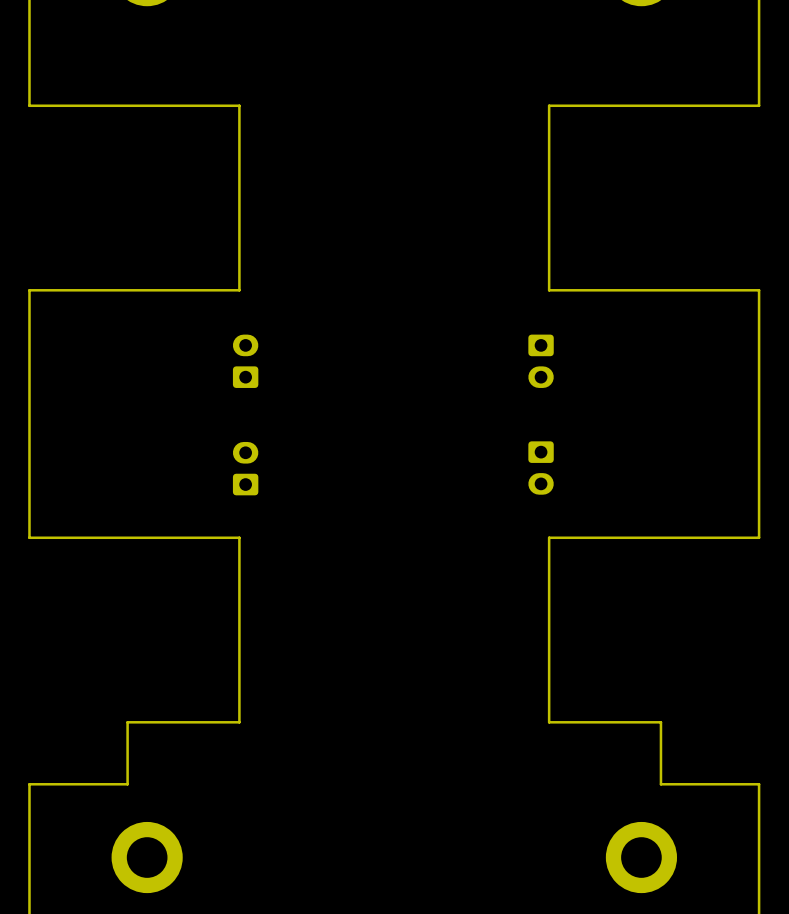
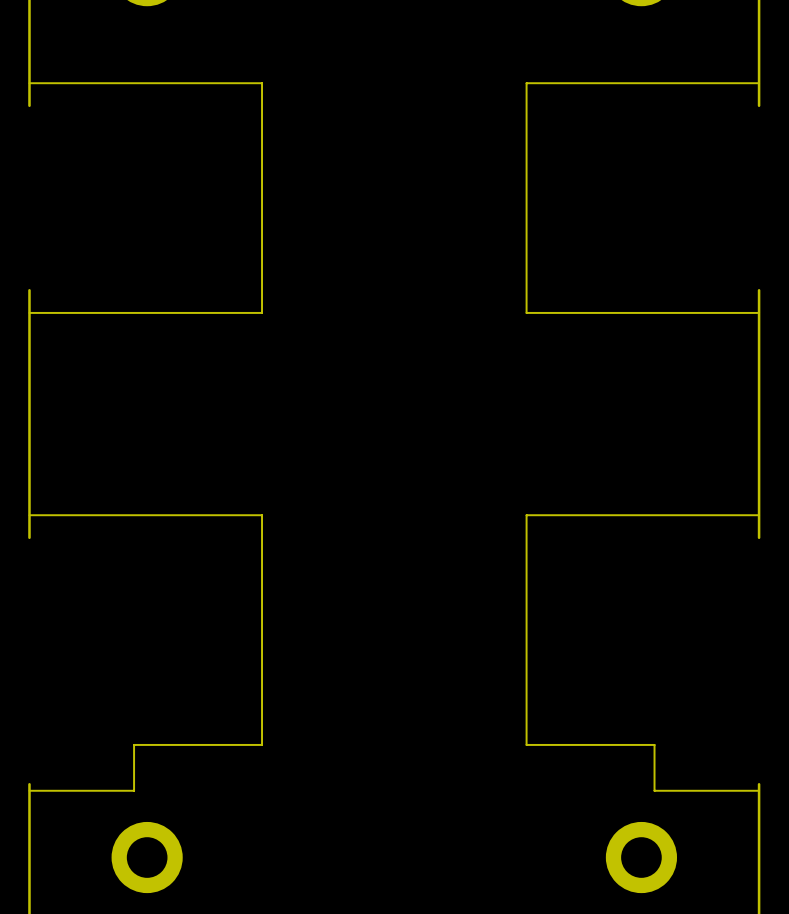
board edge: none -> (29, 83) (262, 83) (262, 312) (29, 312)
board edge: none -> (759, 83) (526, 83) (526, 312) (759, 312)
board edge: (29, 105) (239, 105) (239, 290) (29, 290) -> none
board edge: (759, 105) (549, 105) (549, 290) (759, 290) -> none
part: (245, 361) -> none
part: (541, 361) -> none
part: (245, 468) -> none
part: (541, 468) -> none
board edge: none -> (29, 515) (262, 515) (262, 744) (134, 744) (134, 790) (29, 790)
board edge: none -> (759, 515) (526, 515) (526, 744) (654, 744) (654, 790) (759, 790)
board edge: (29, 537) (239, 537) (239, 722) (127, 722) (127, 784) (29, 784) -> none
board edge: (759, 537) (549, 537) (549, 722) (660, 722) (660, 784) (759, 784) -> none

